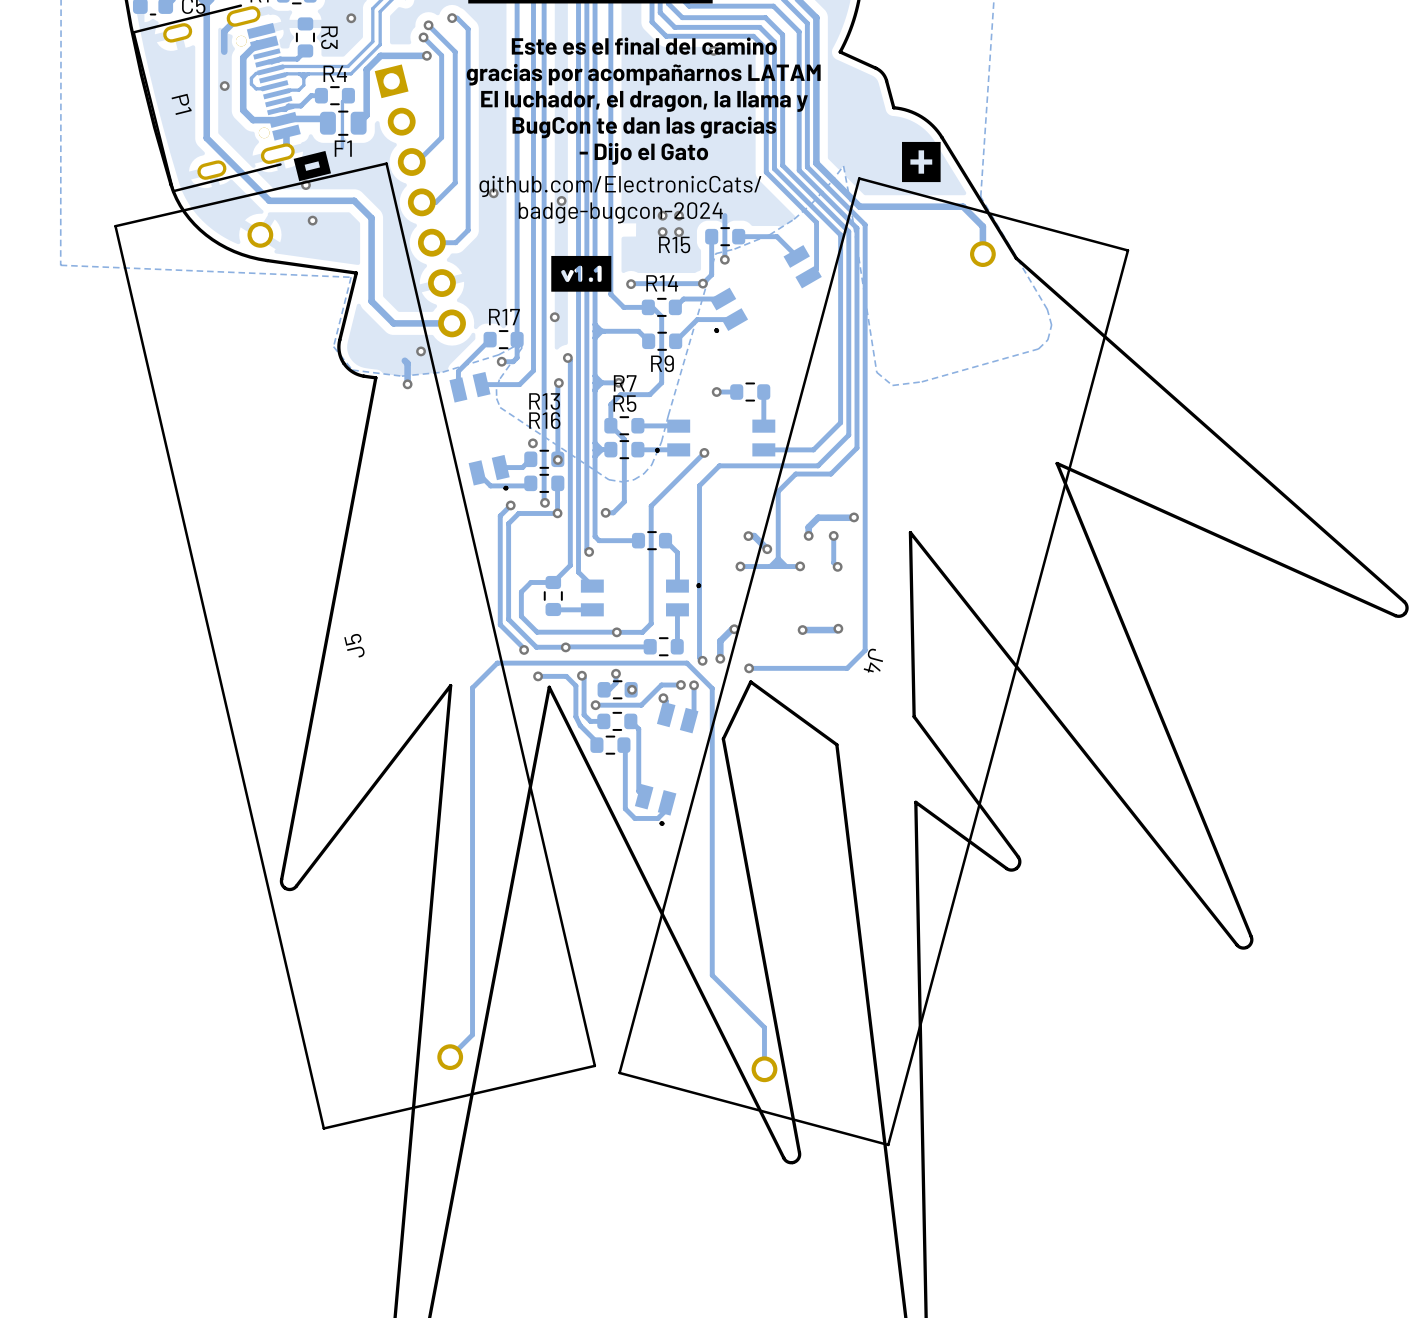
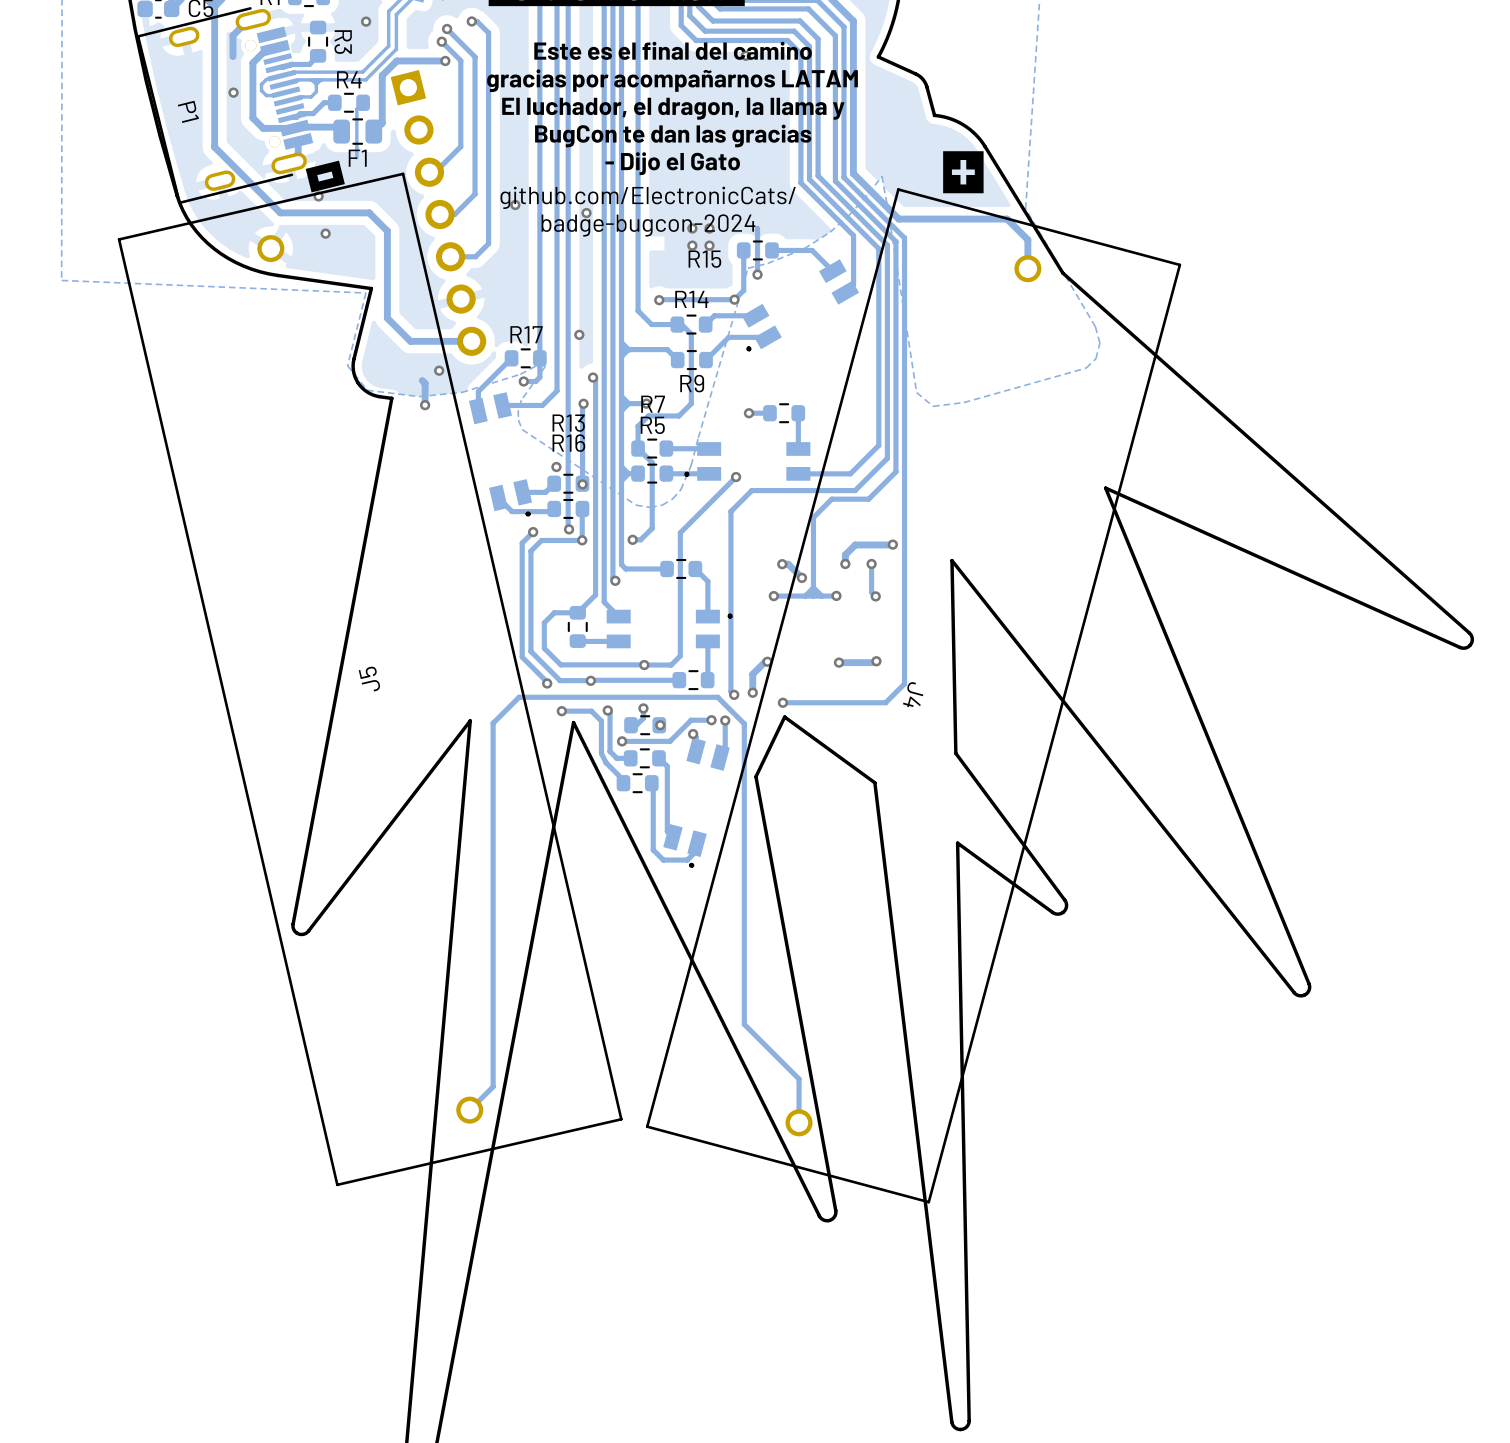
drawing: [551, 255, 612, 292] -> none

